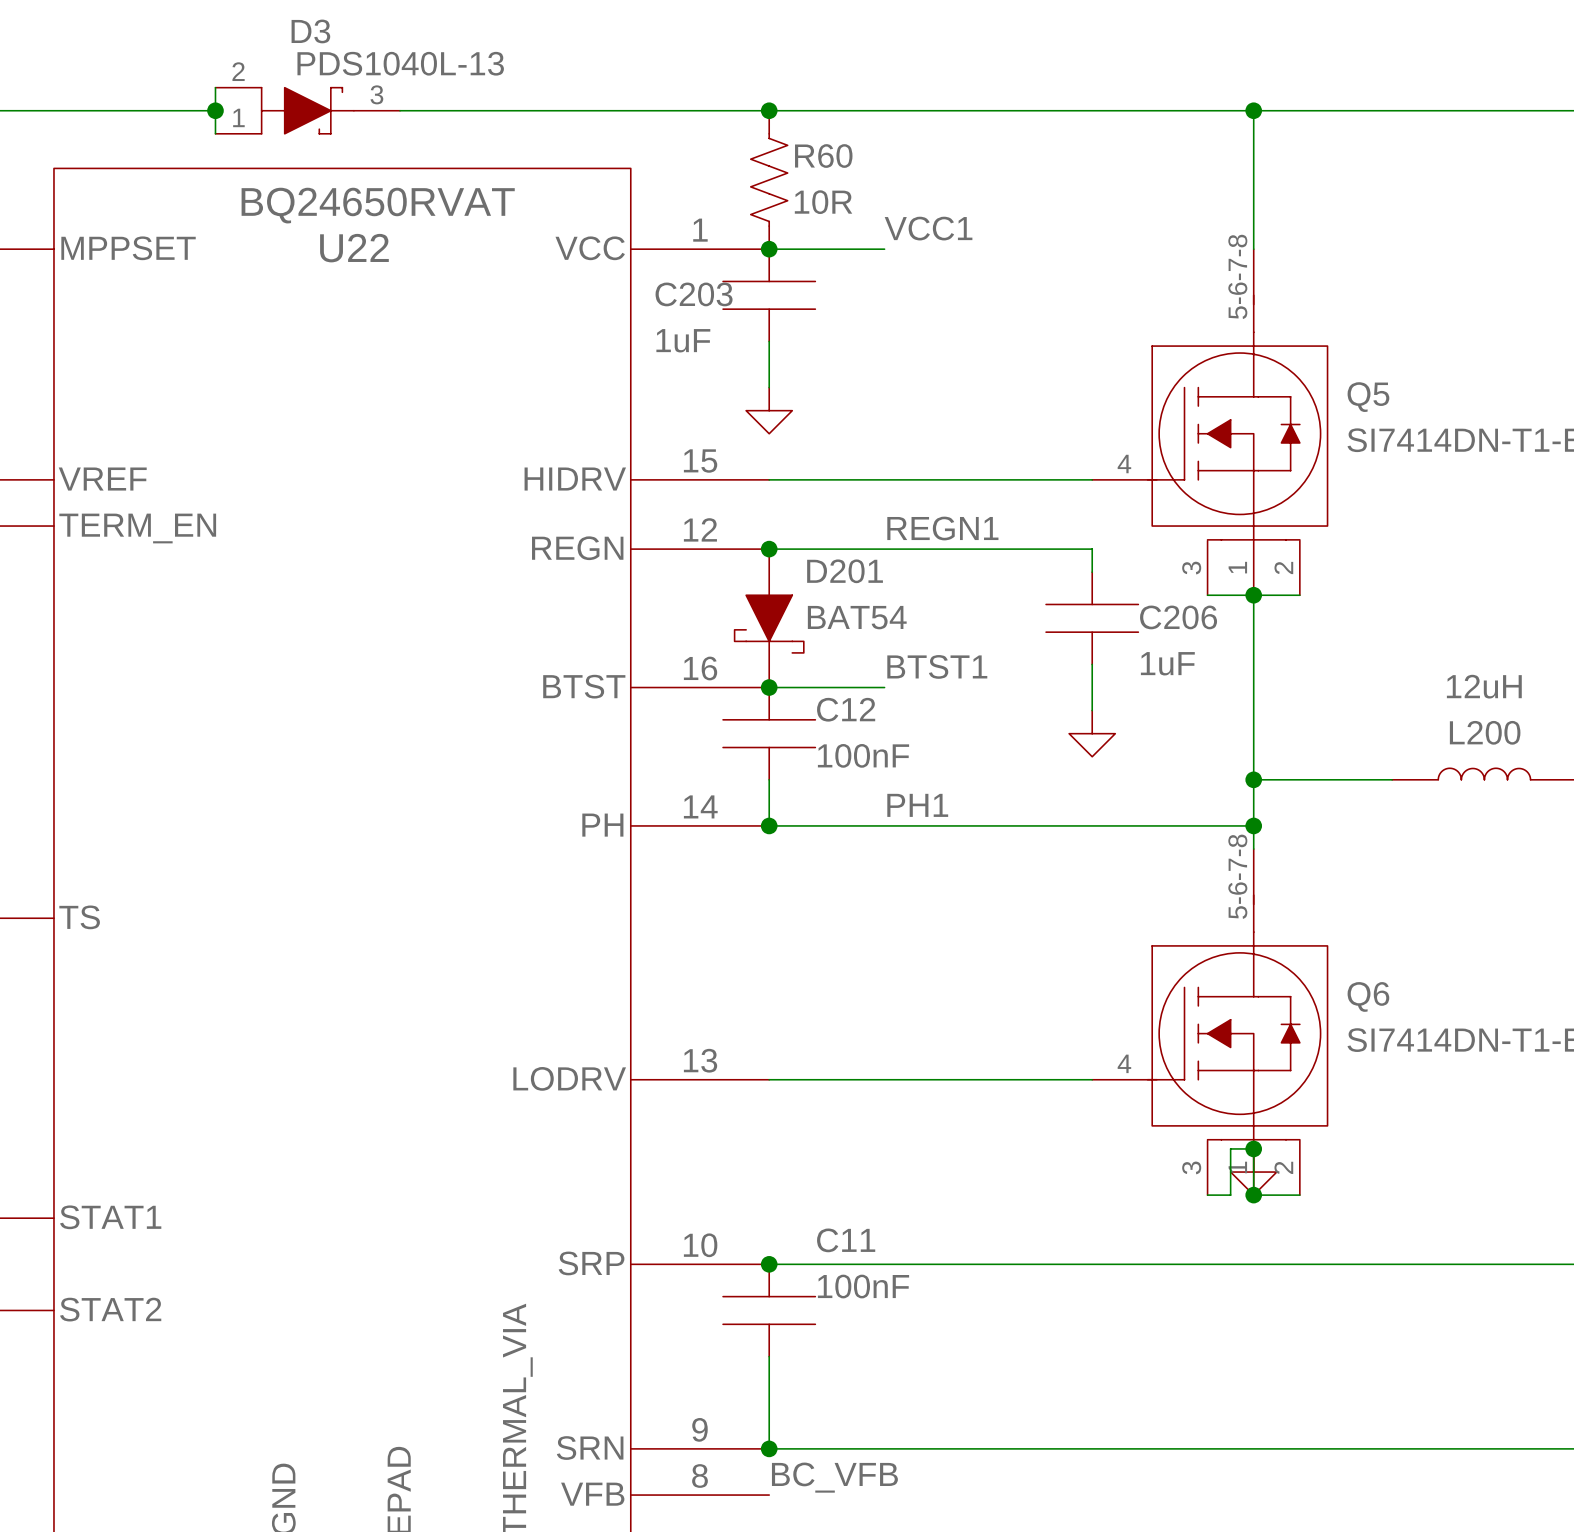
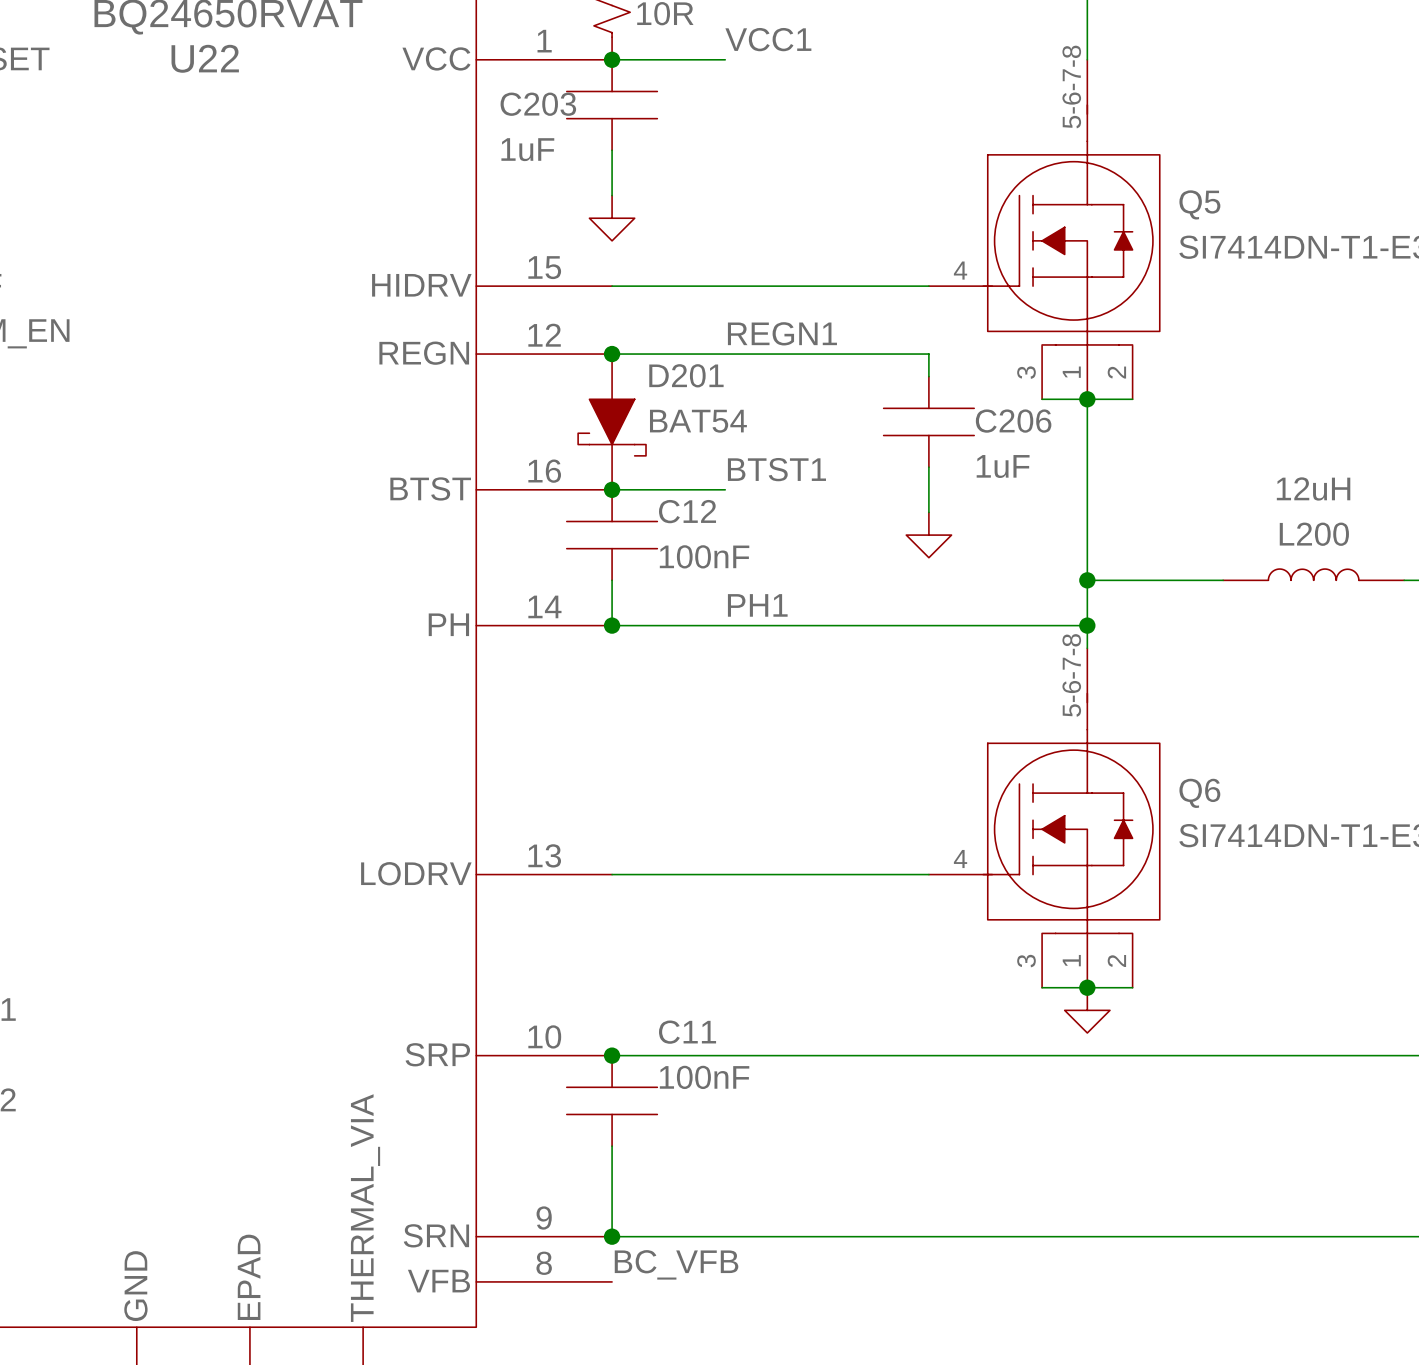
junction: (1253, 1148) -> none
power symbol position: (1253, 1172) -> (1087, 1010)
wire: (1230, 1195) (1230, 1148) (1253, 1148) (1253, 1195) -> (1064, 987) (1087, 987)

